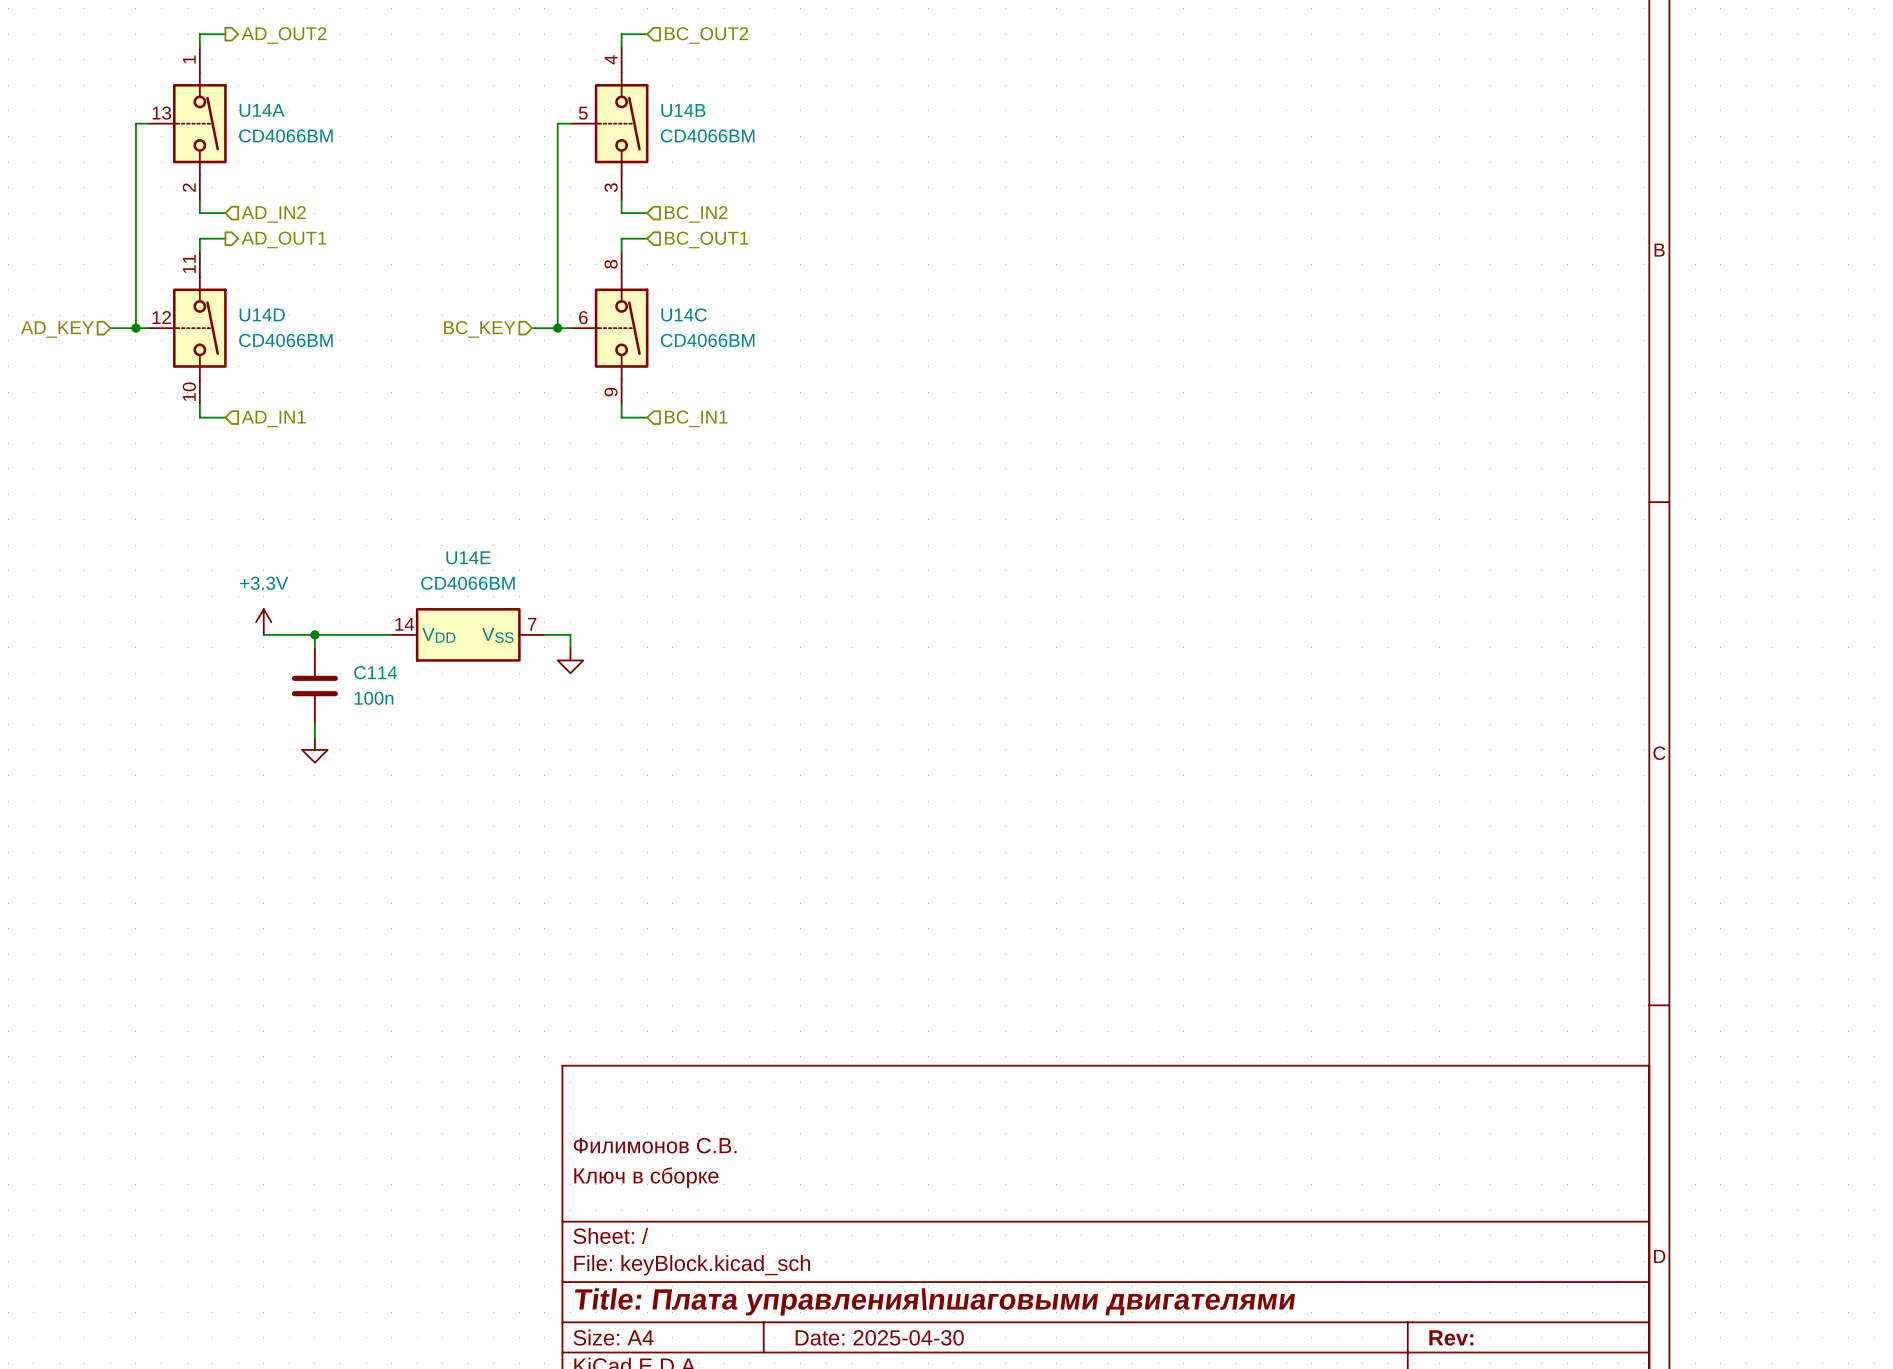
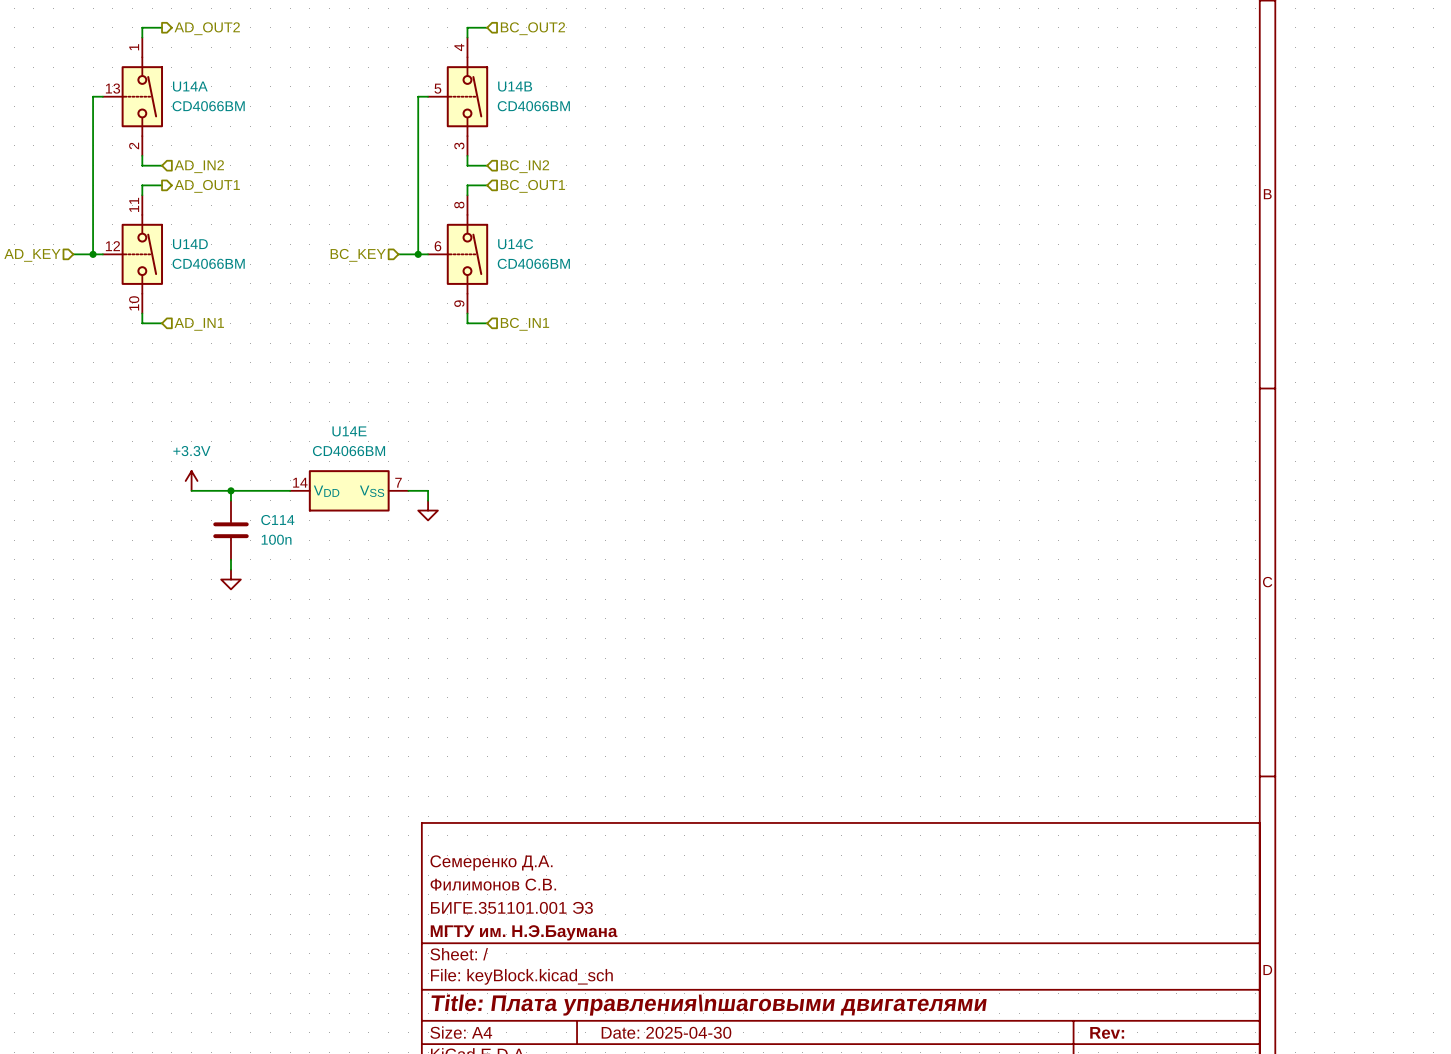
title block: none -> Семеренко Д.А. (491, 863)
title block: Ключ в сборке (646, 1177) -> БИГЕ.351101.001 Э3 (511, 907)
title block: none -> МГТУ им. Н.Э.Баумана (524, 932)

